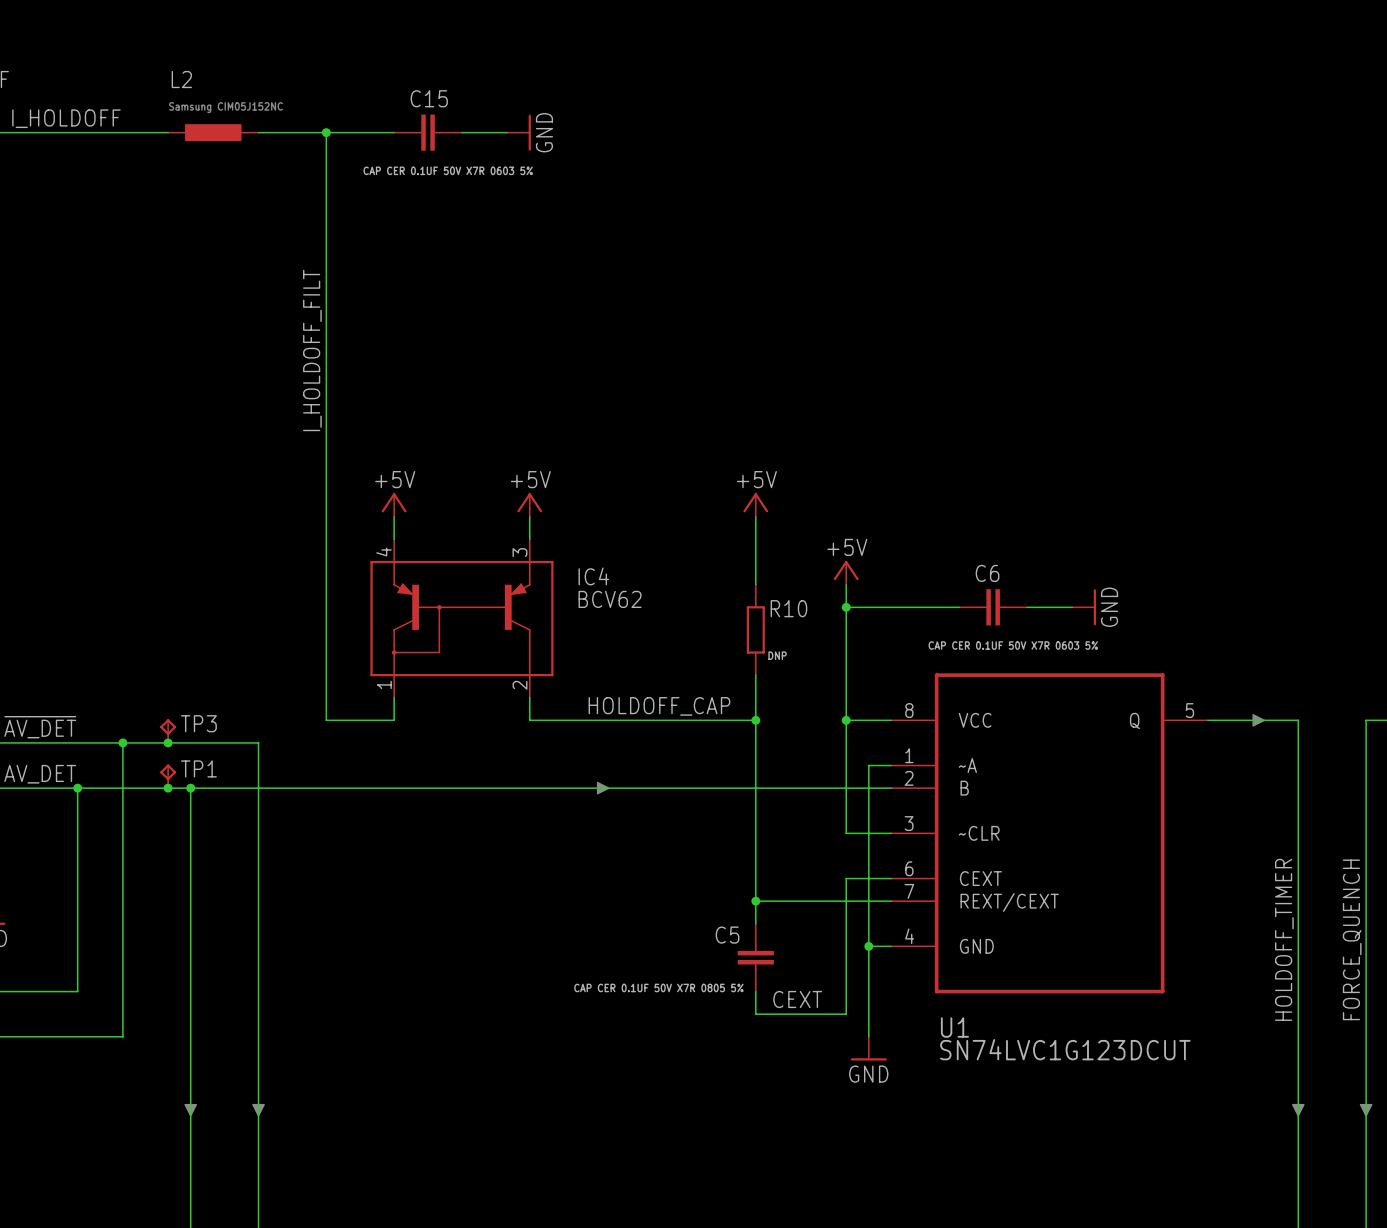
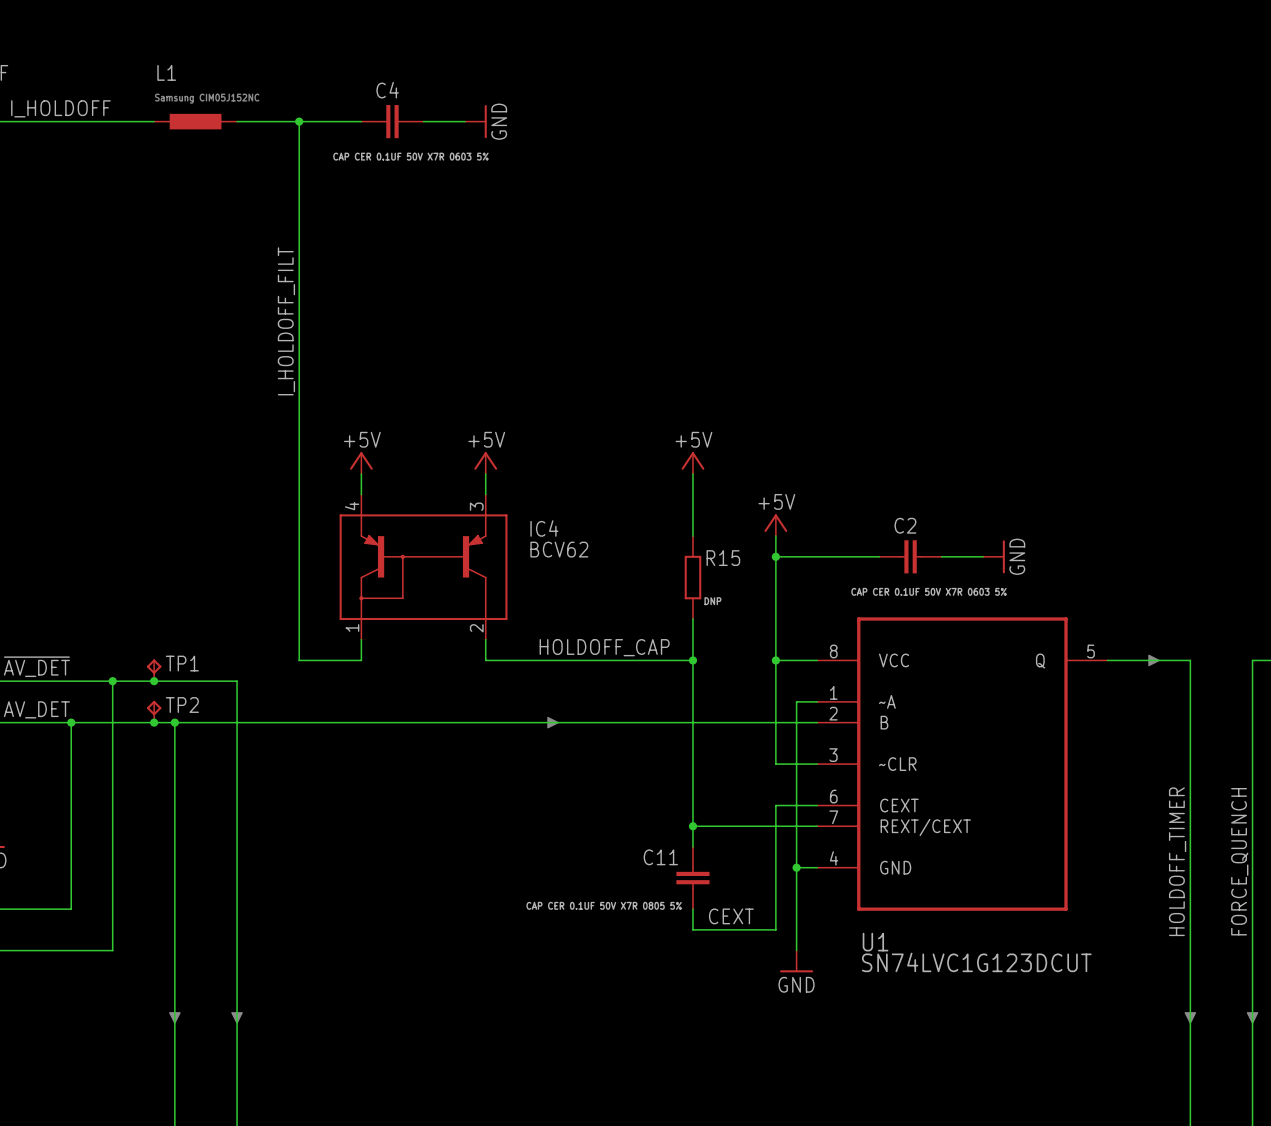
L2 name: L2 (181, 79) -> L1 (166, 72)
C15 name: C15 (429, 98) -> C4 (387, 90)
C6 name: C6 (987, 573) -> C2 (905, 525)
R10 name: R10 (788, 608) -> R15 (723, 558)
TP3 name: TP3 (198, 723) -> TP1 (182, 663)
TP1 name: TP1 (198, 768) -> TP2 (182, 705)
C5 name: C5 (727, 935) -> C11 (660, 857)

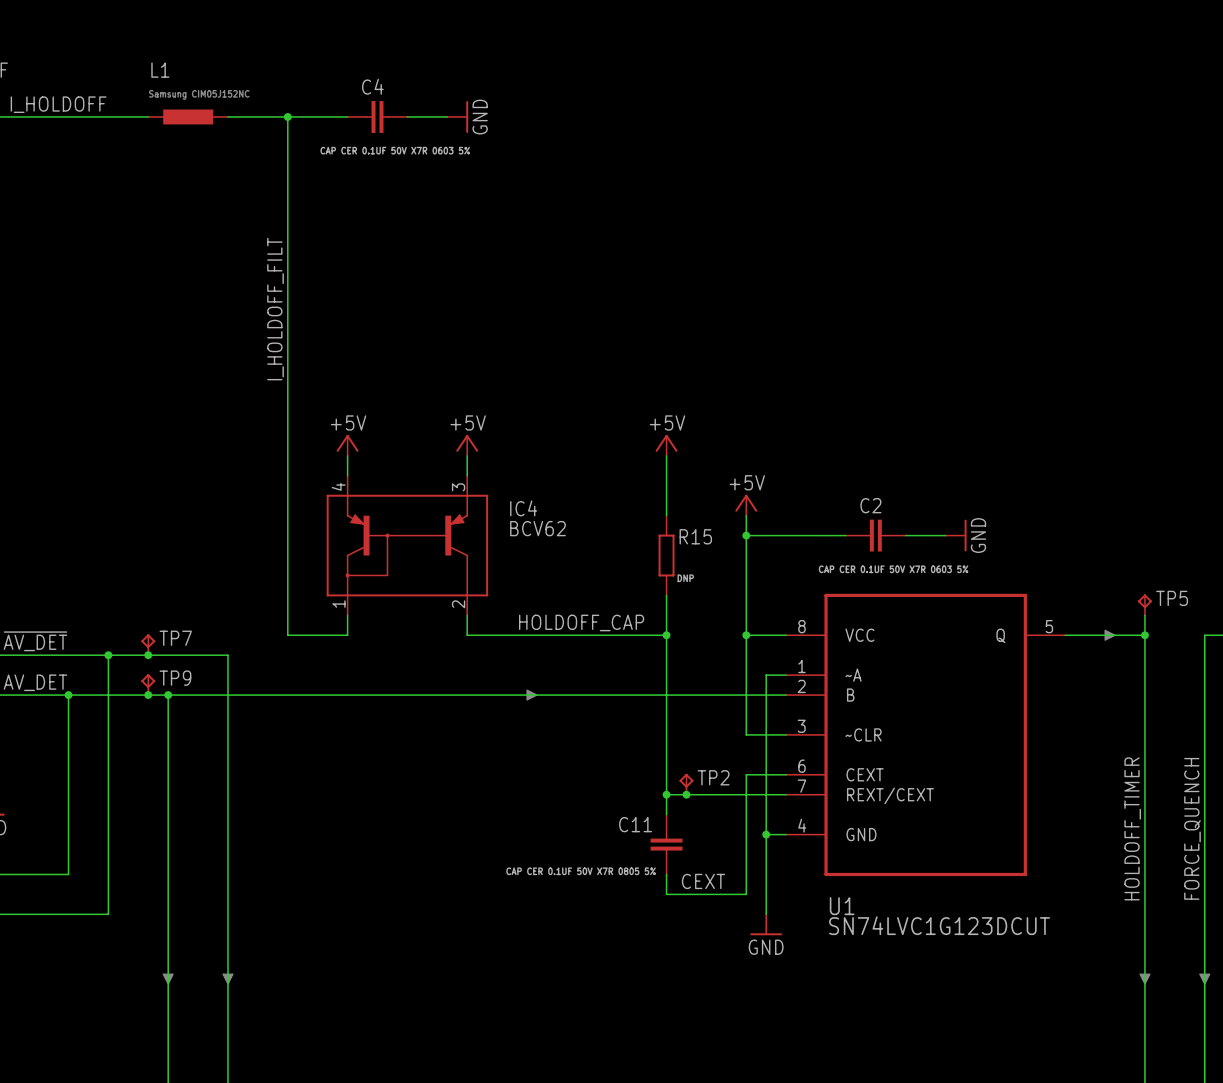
TP5: none -> (1144, 604)
wire: none -> (1144, 615) (1144, 635)
junction: none -> (1144, 635)
TP1 name: TP1 (182, 663) -> TP7 (175, 638)
TP2 name: TP2 (182, 705) -> TP9 (175, 678)
TP2: none -> (686, 784)
junction: none -> (686, 794)

